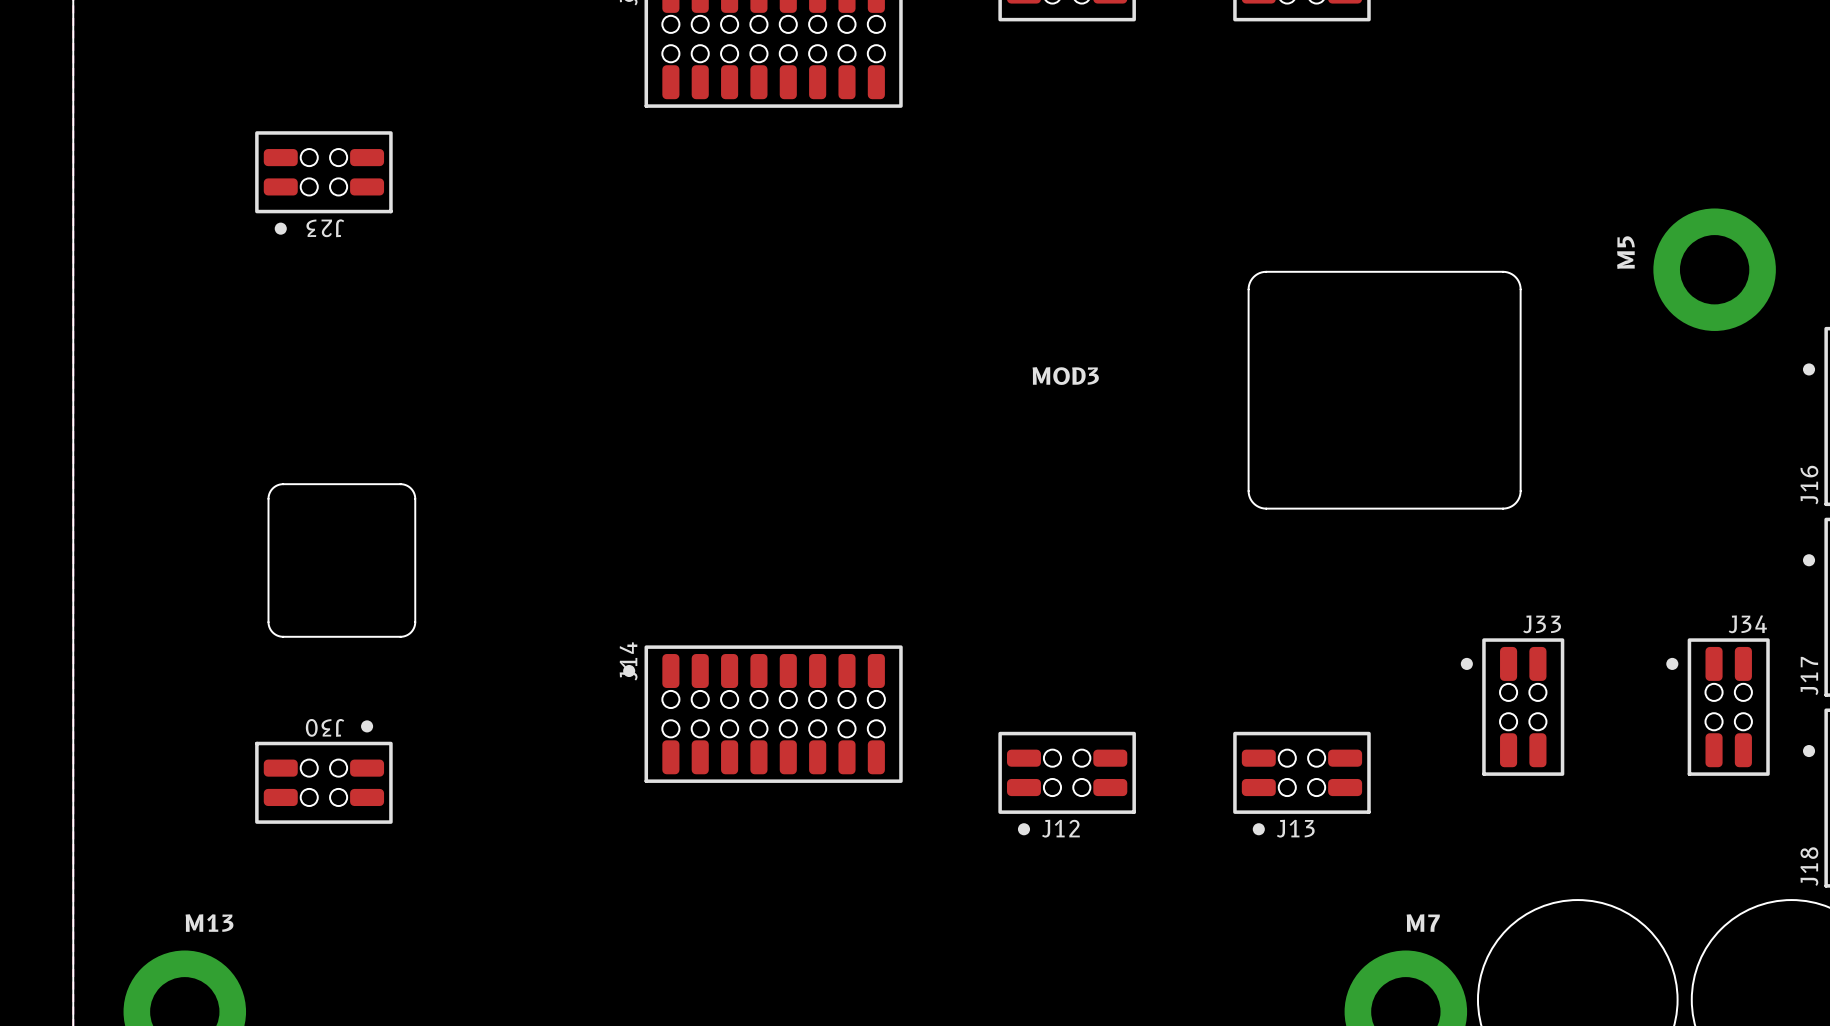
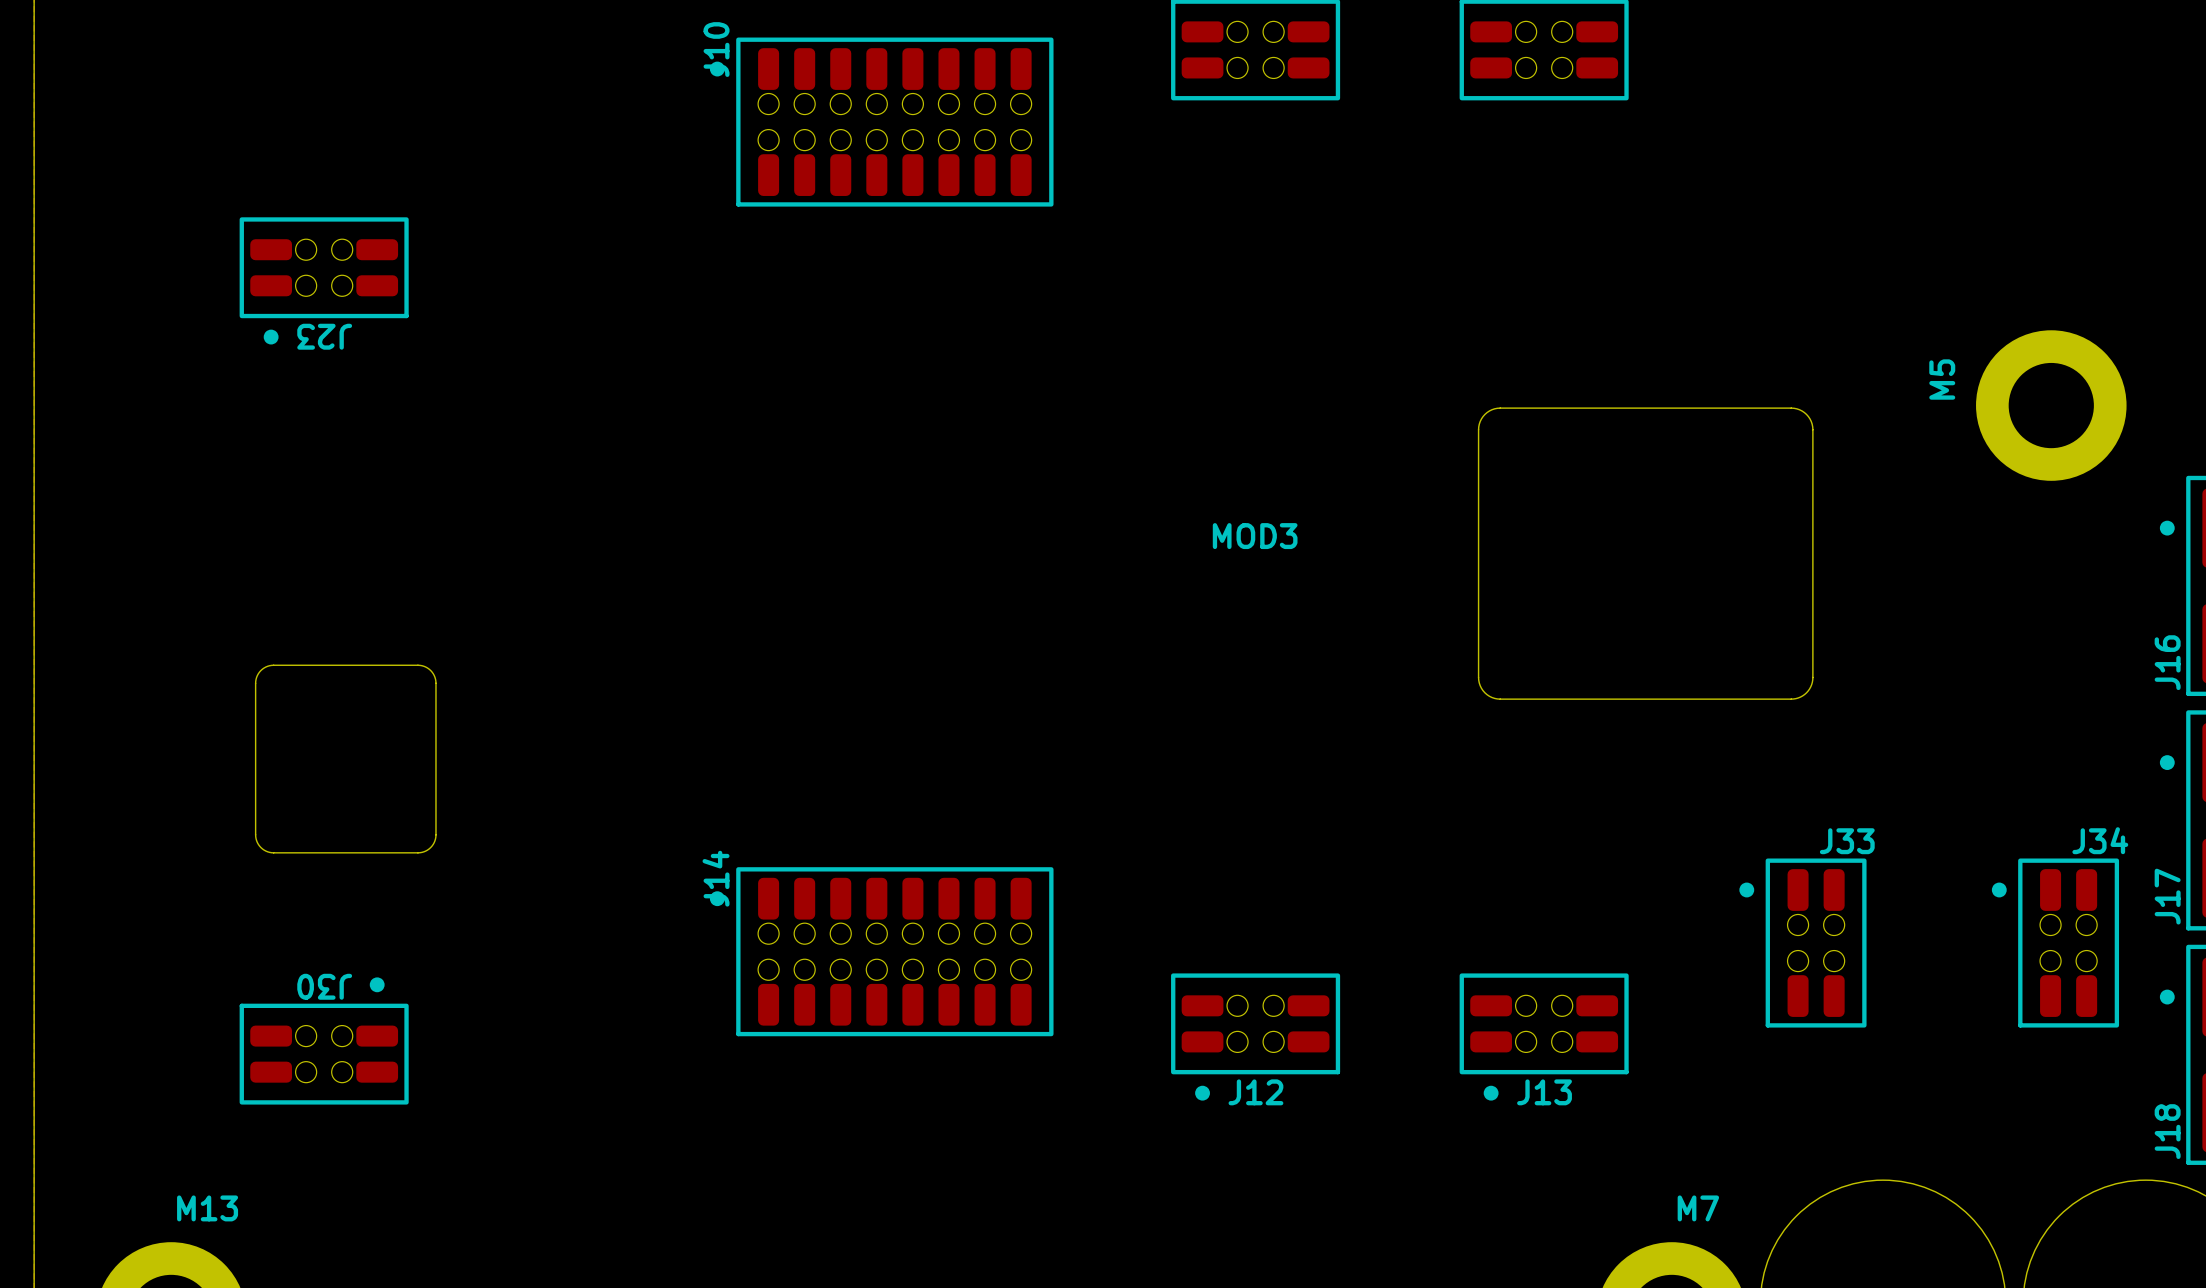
J23 position: (323, 182) -> (324, 280)
drawing position: (341, 560) -> (345, 759)
J30 position: (323, 772) -> (324, 1040)

